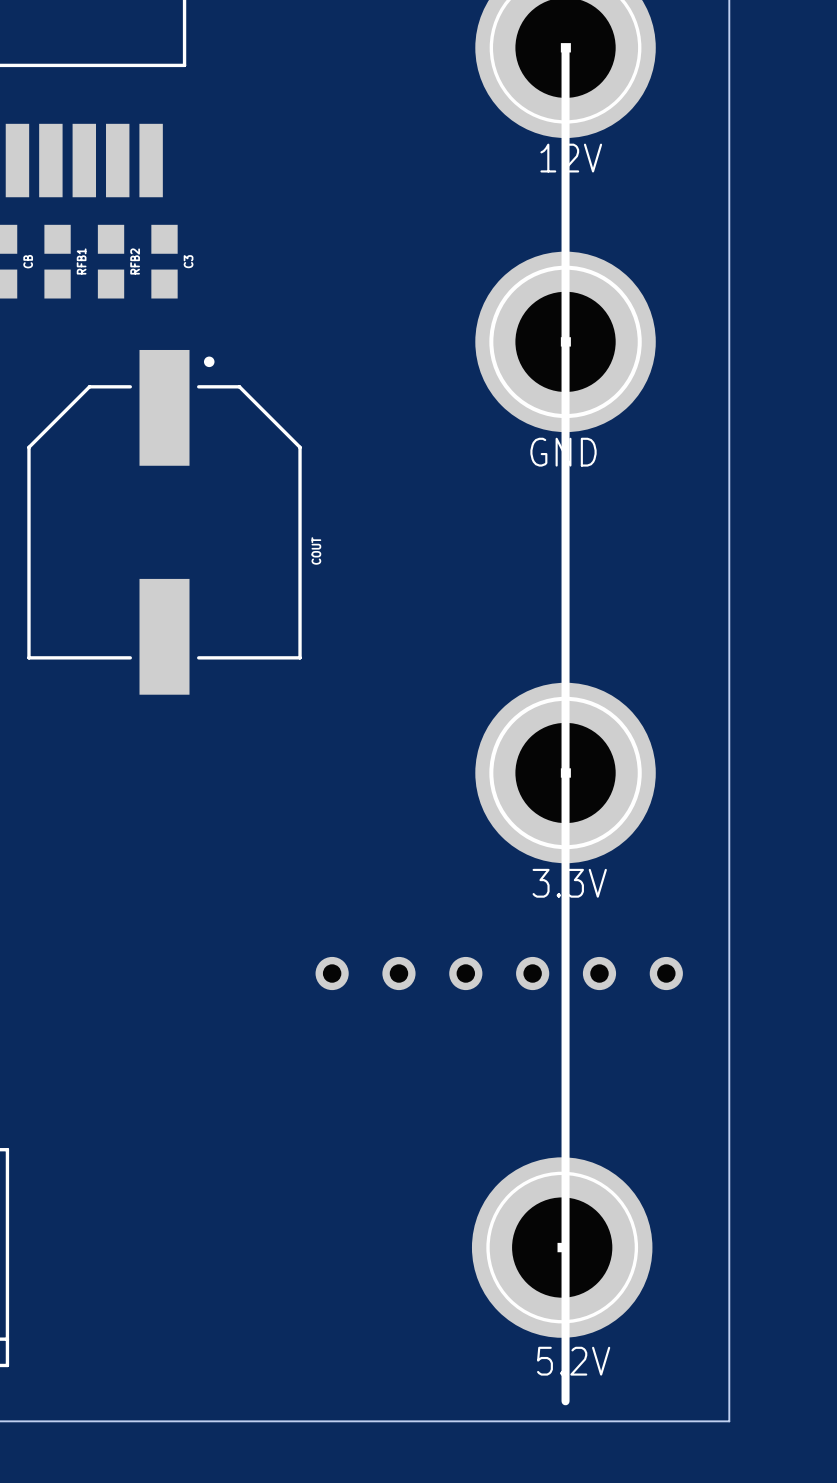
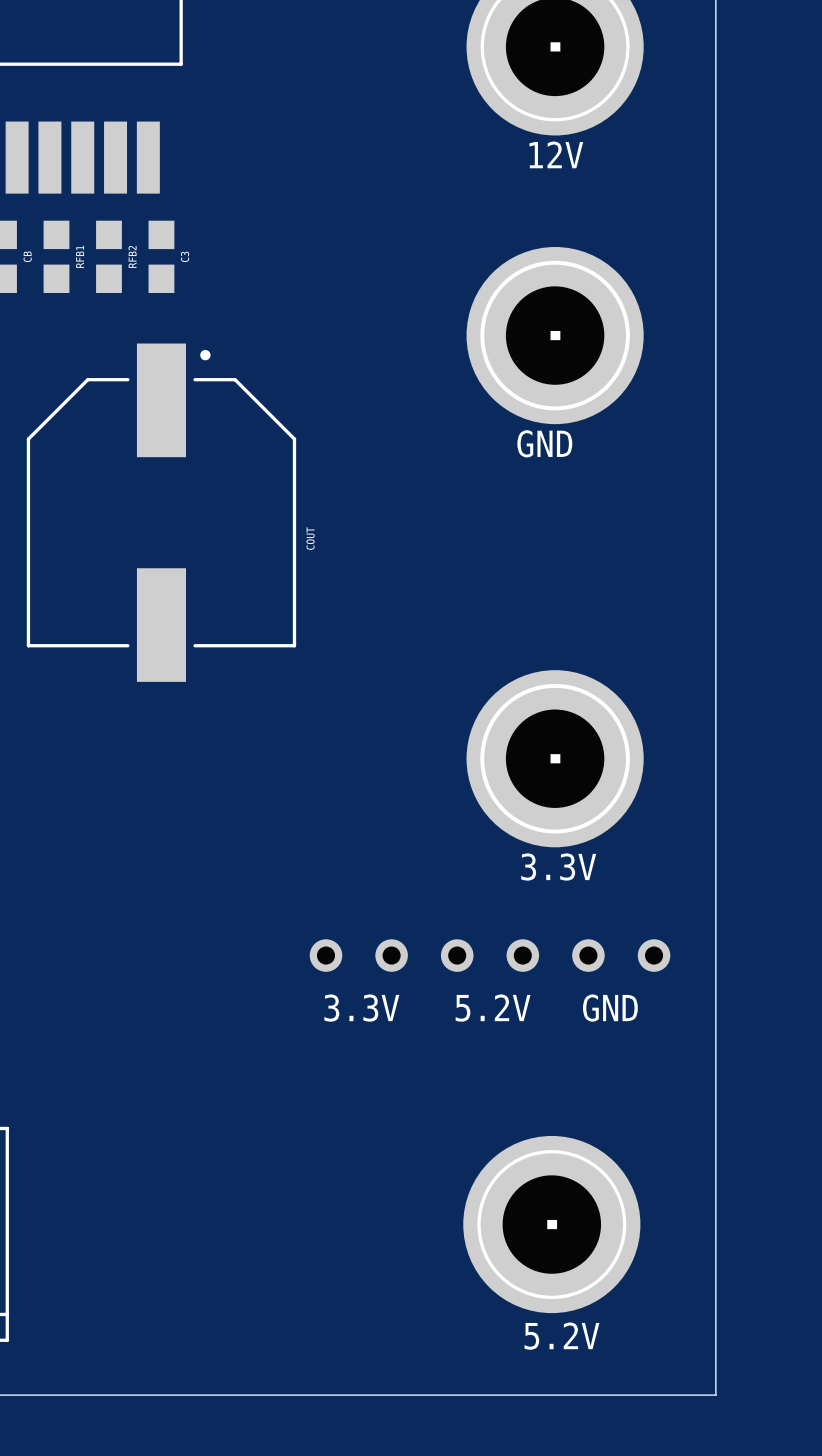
line: (565, 47) (565, 1401) -> none
text: none -> 3.3V (361, 1008)
text: none -> 5.2V (493, 1008)
text: none -> GND (610, 1008)

